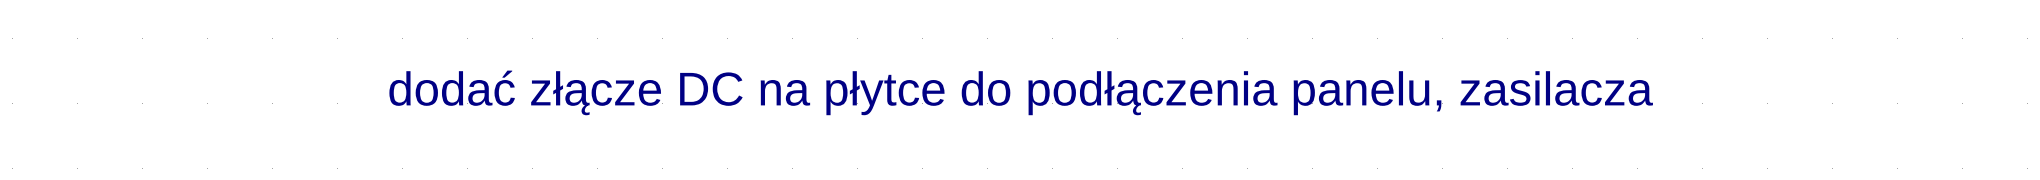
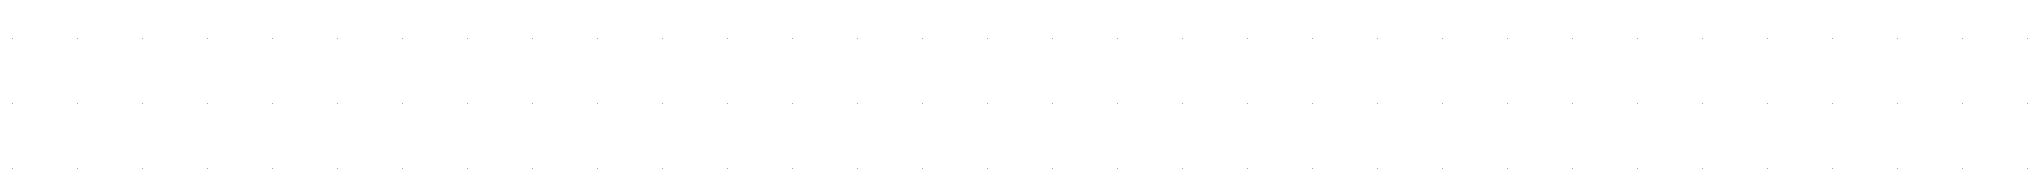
text: dodać złącze DC na płytce do podłączenia panelu, zasilacza (1021, 92) -> none

